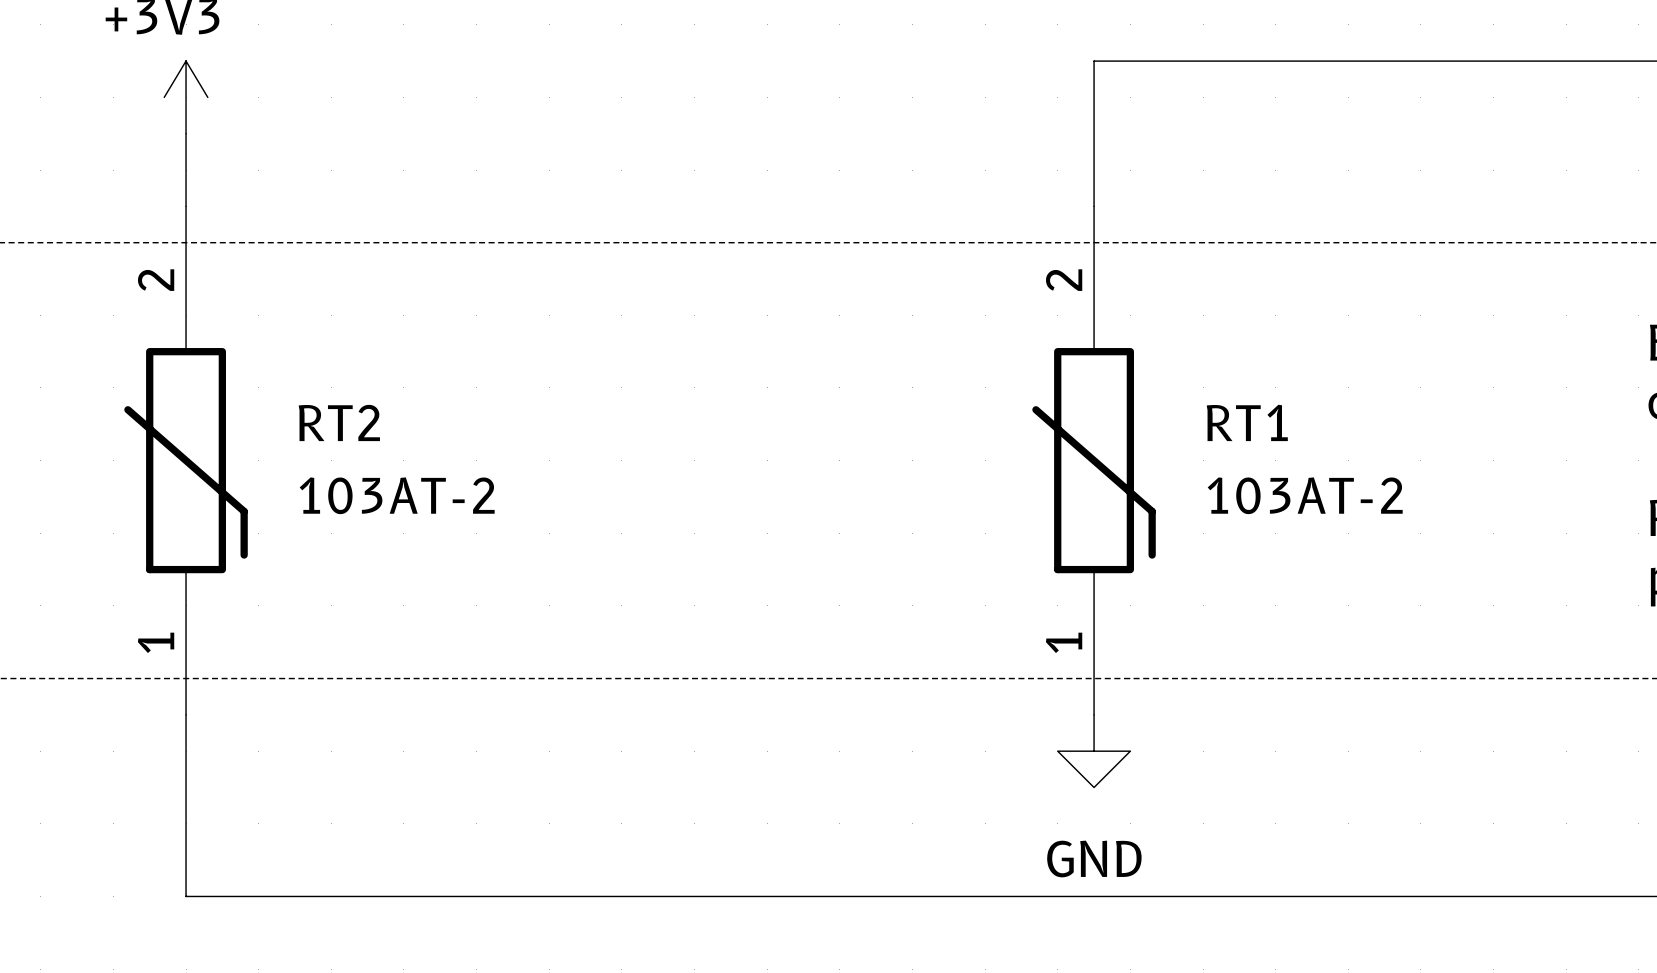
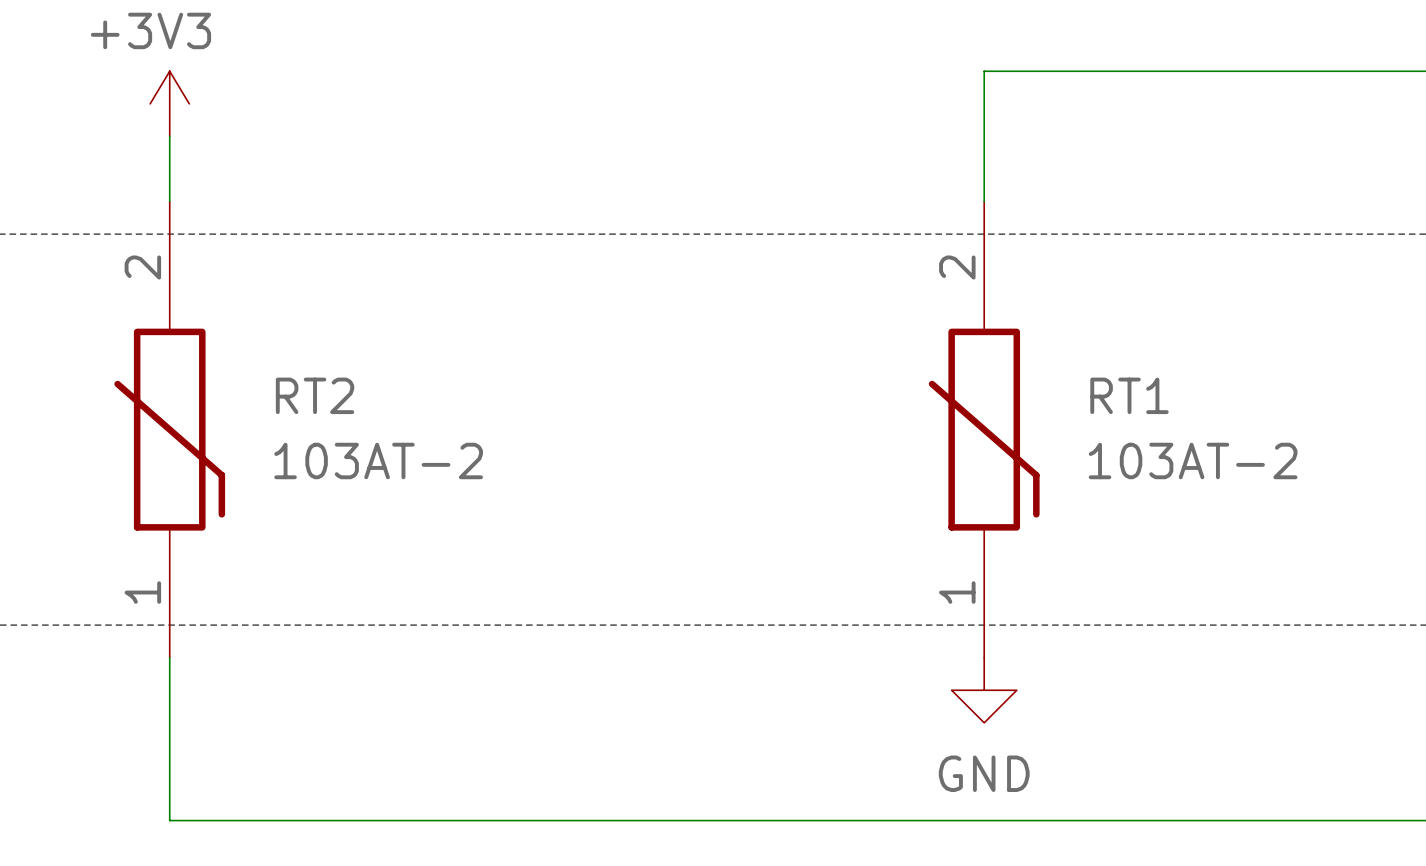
power symbol text position: GND (1094, 858) -> GND (984, 773)

